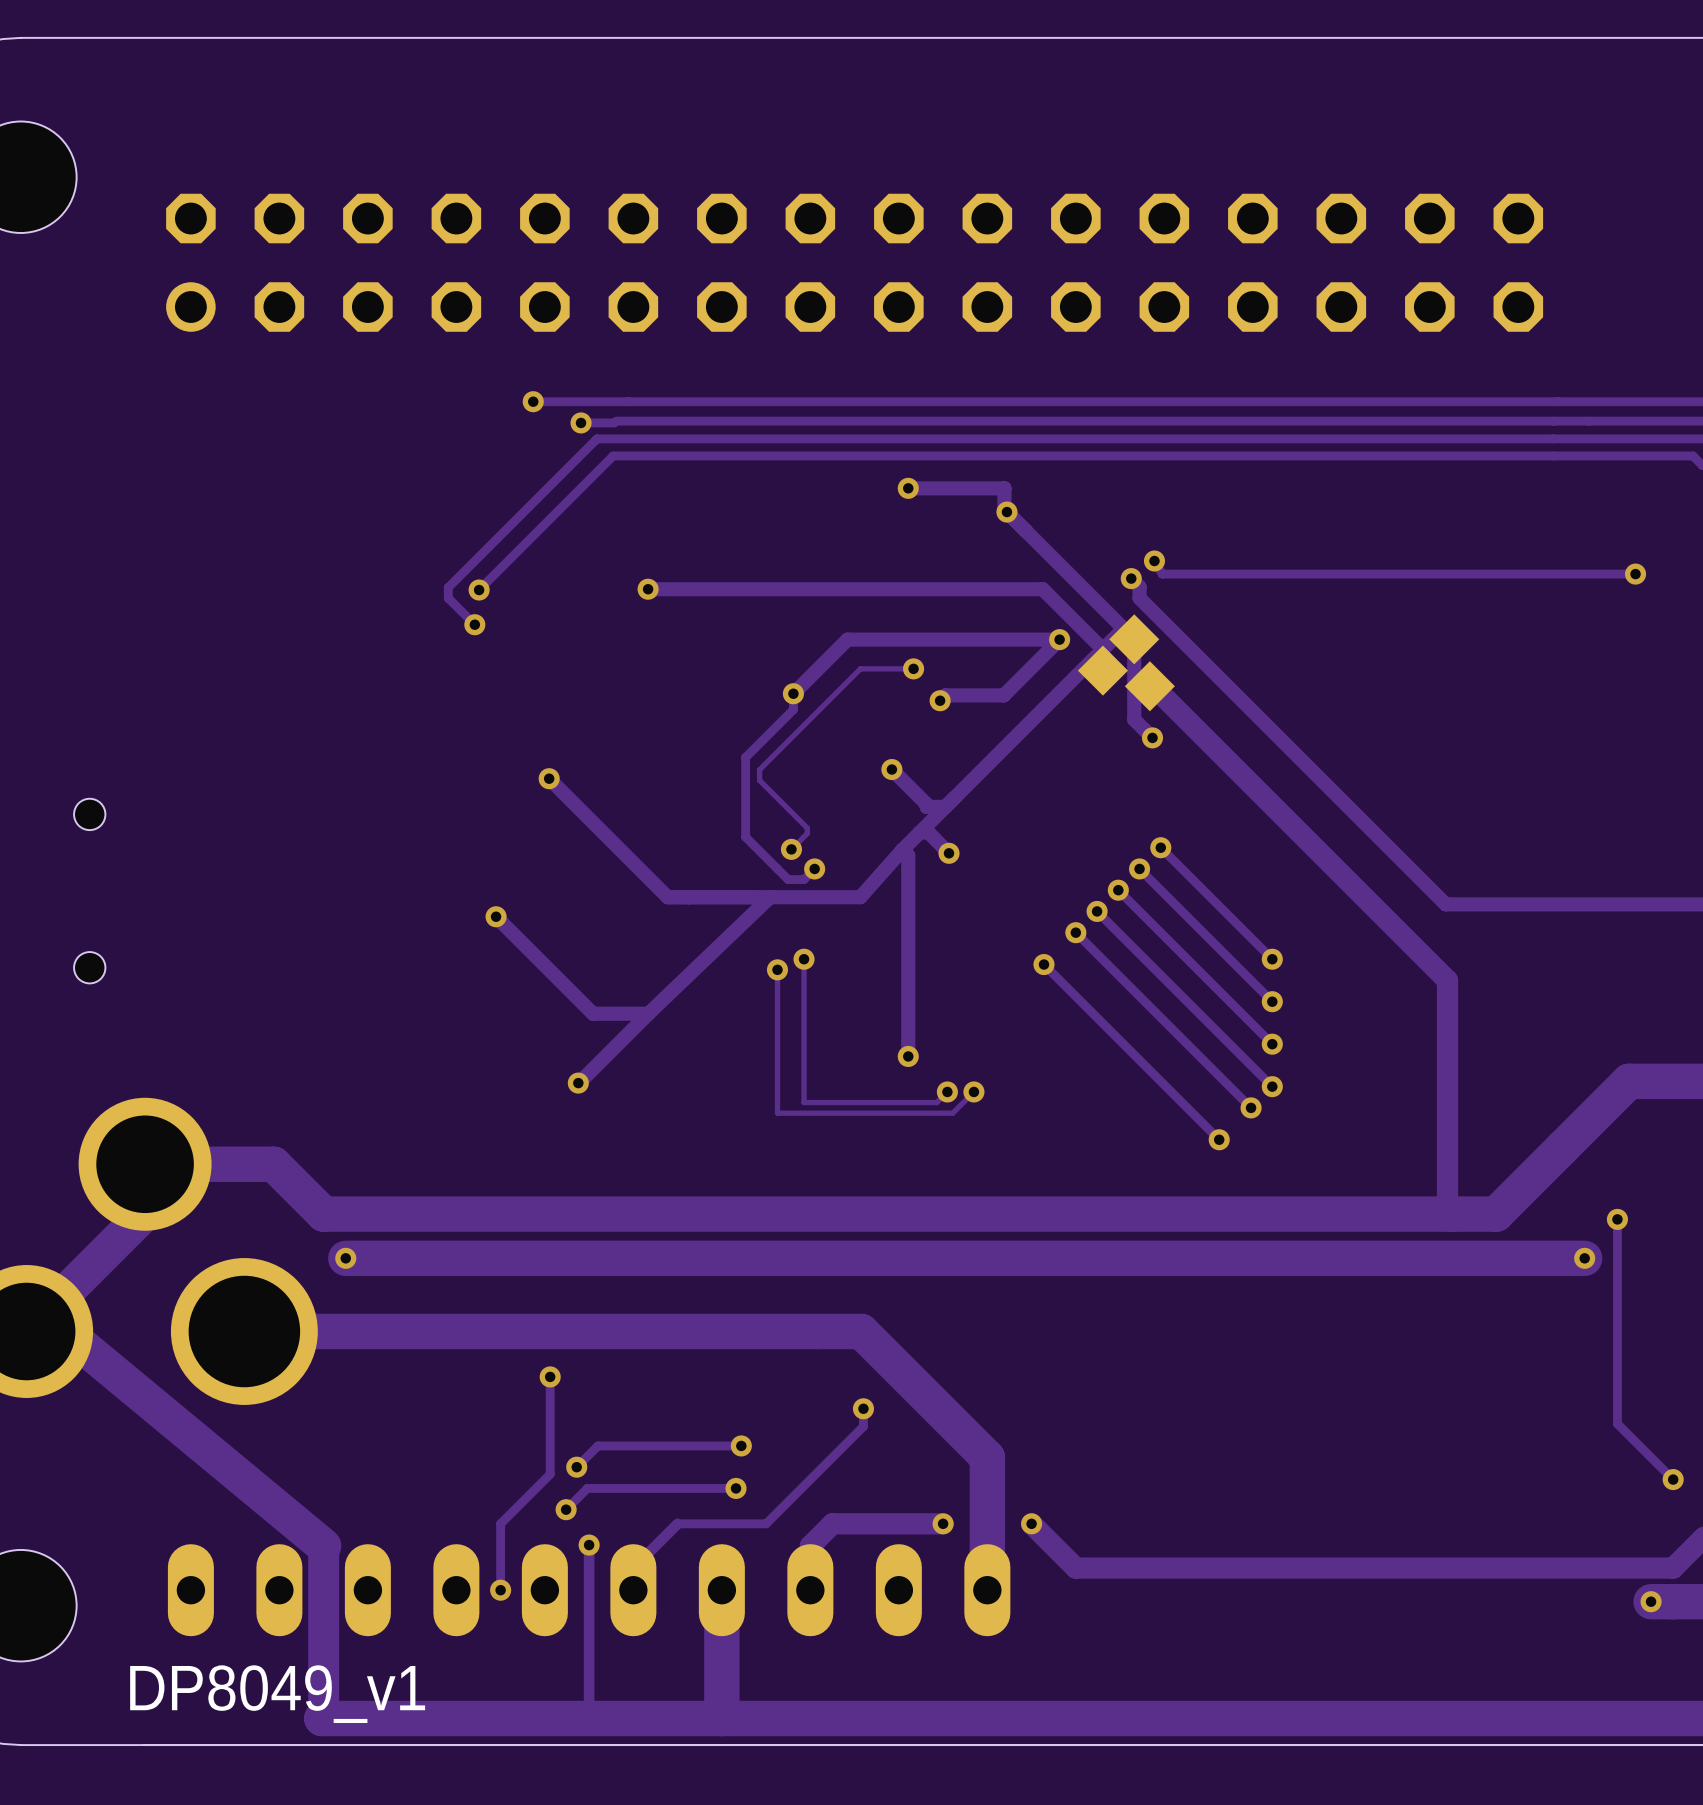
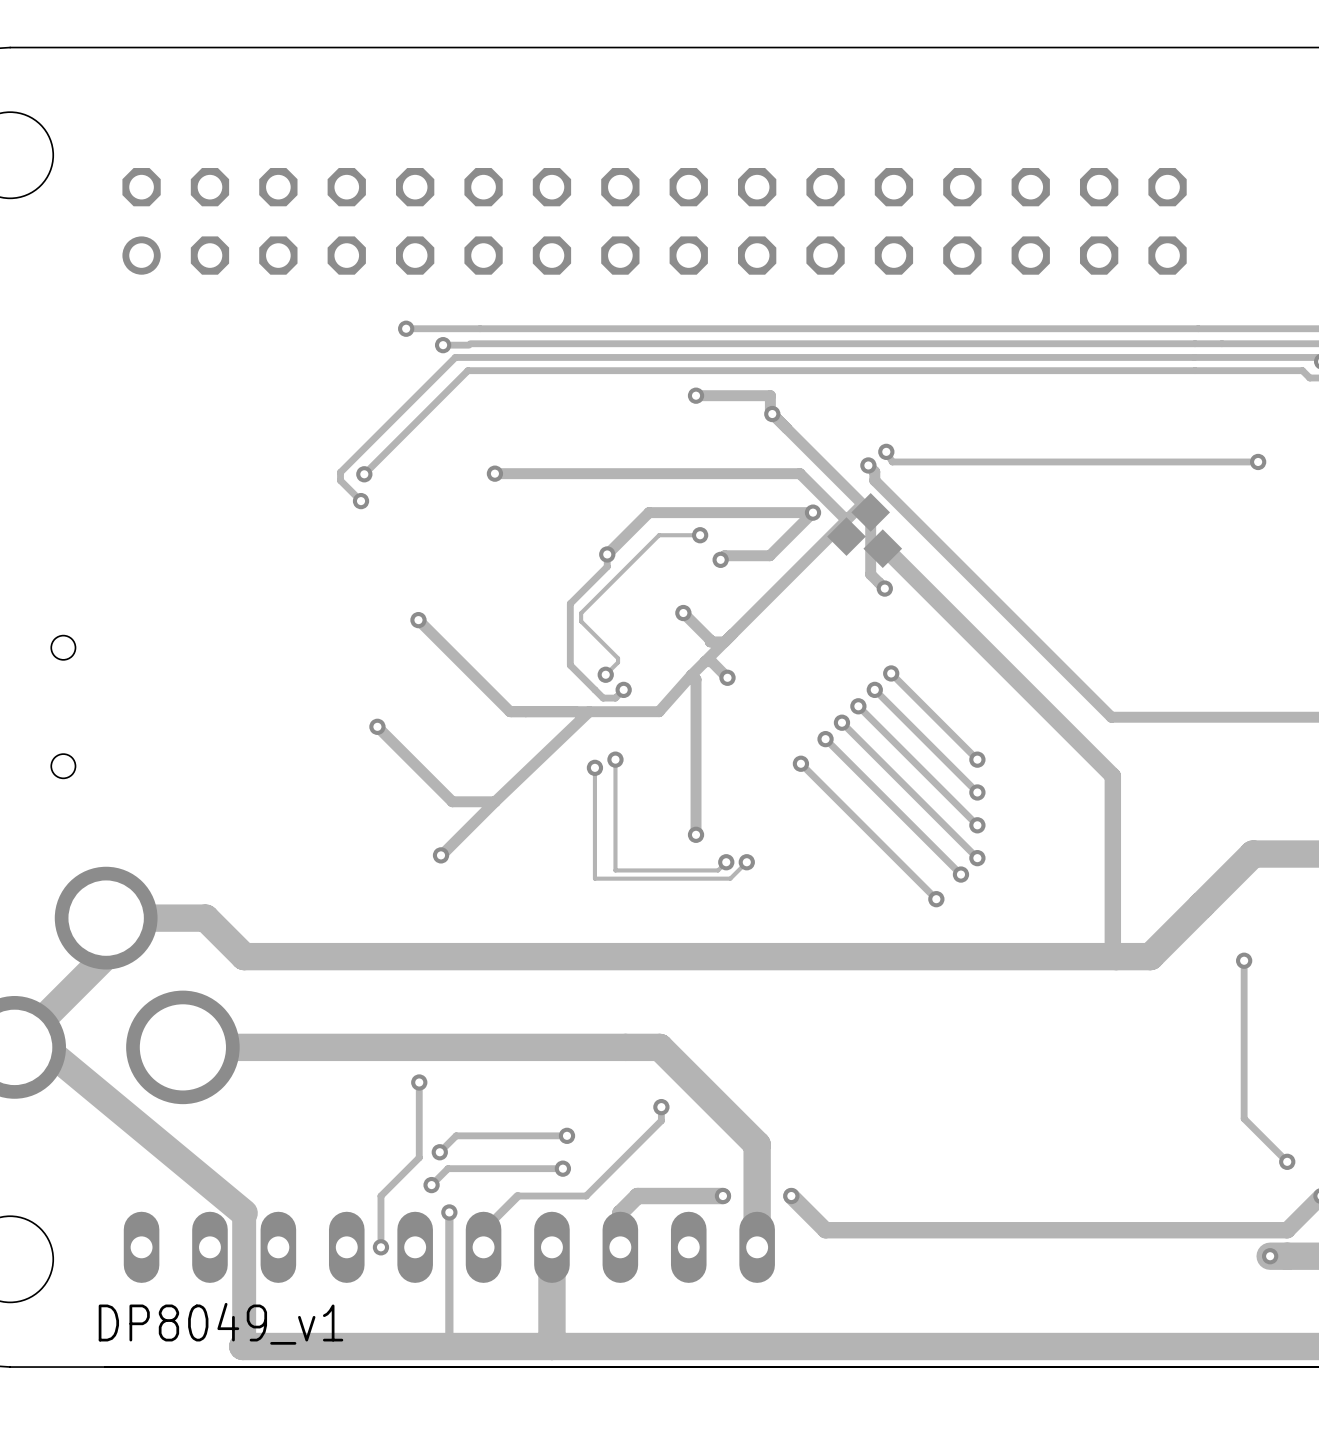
via: (345, 1258) -> none
track: (1584, 1258) (345, 1258) -> none
via: (1584, 1258) -> none

